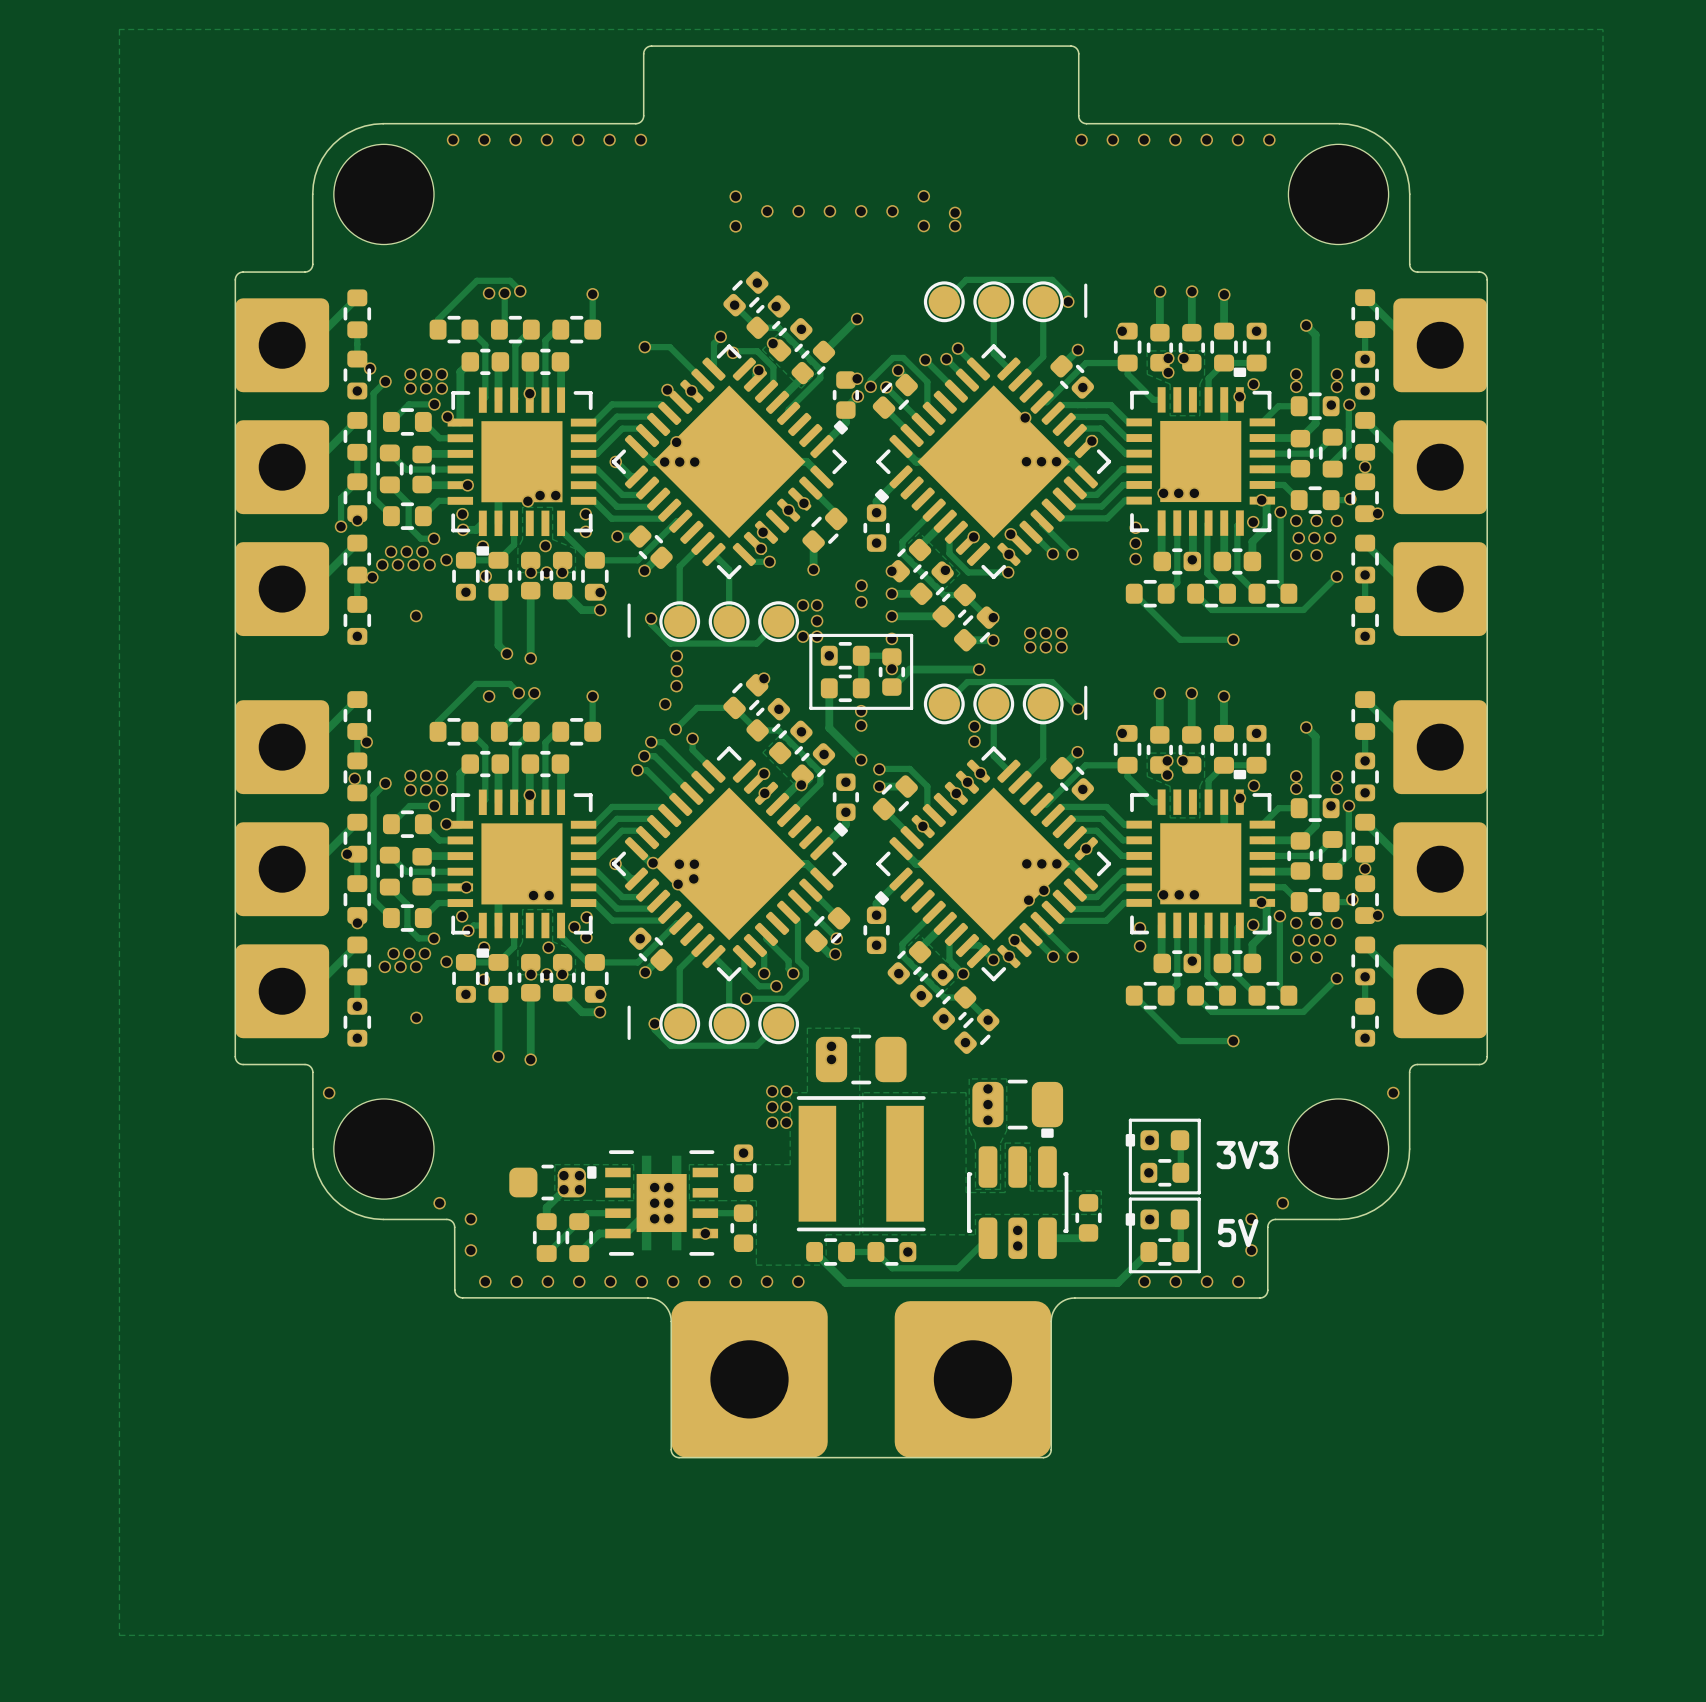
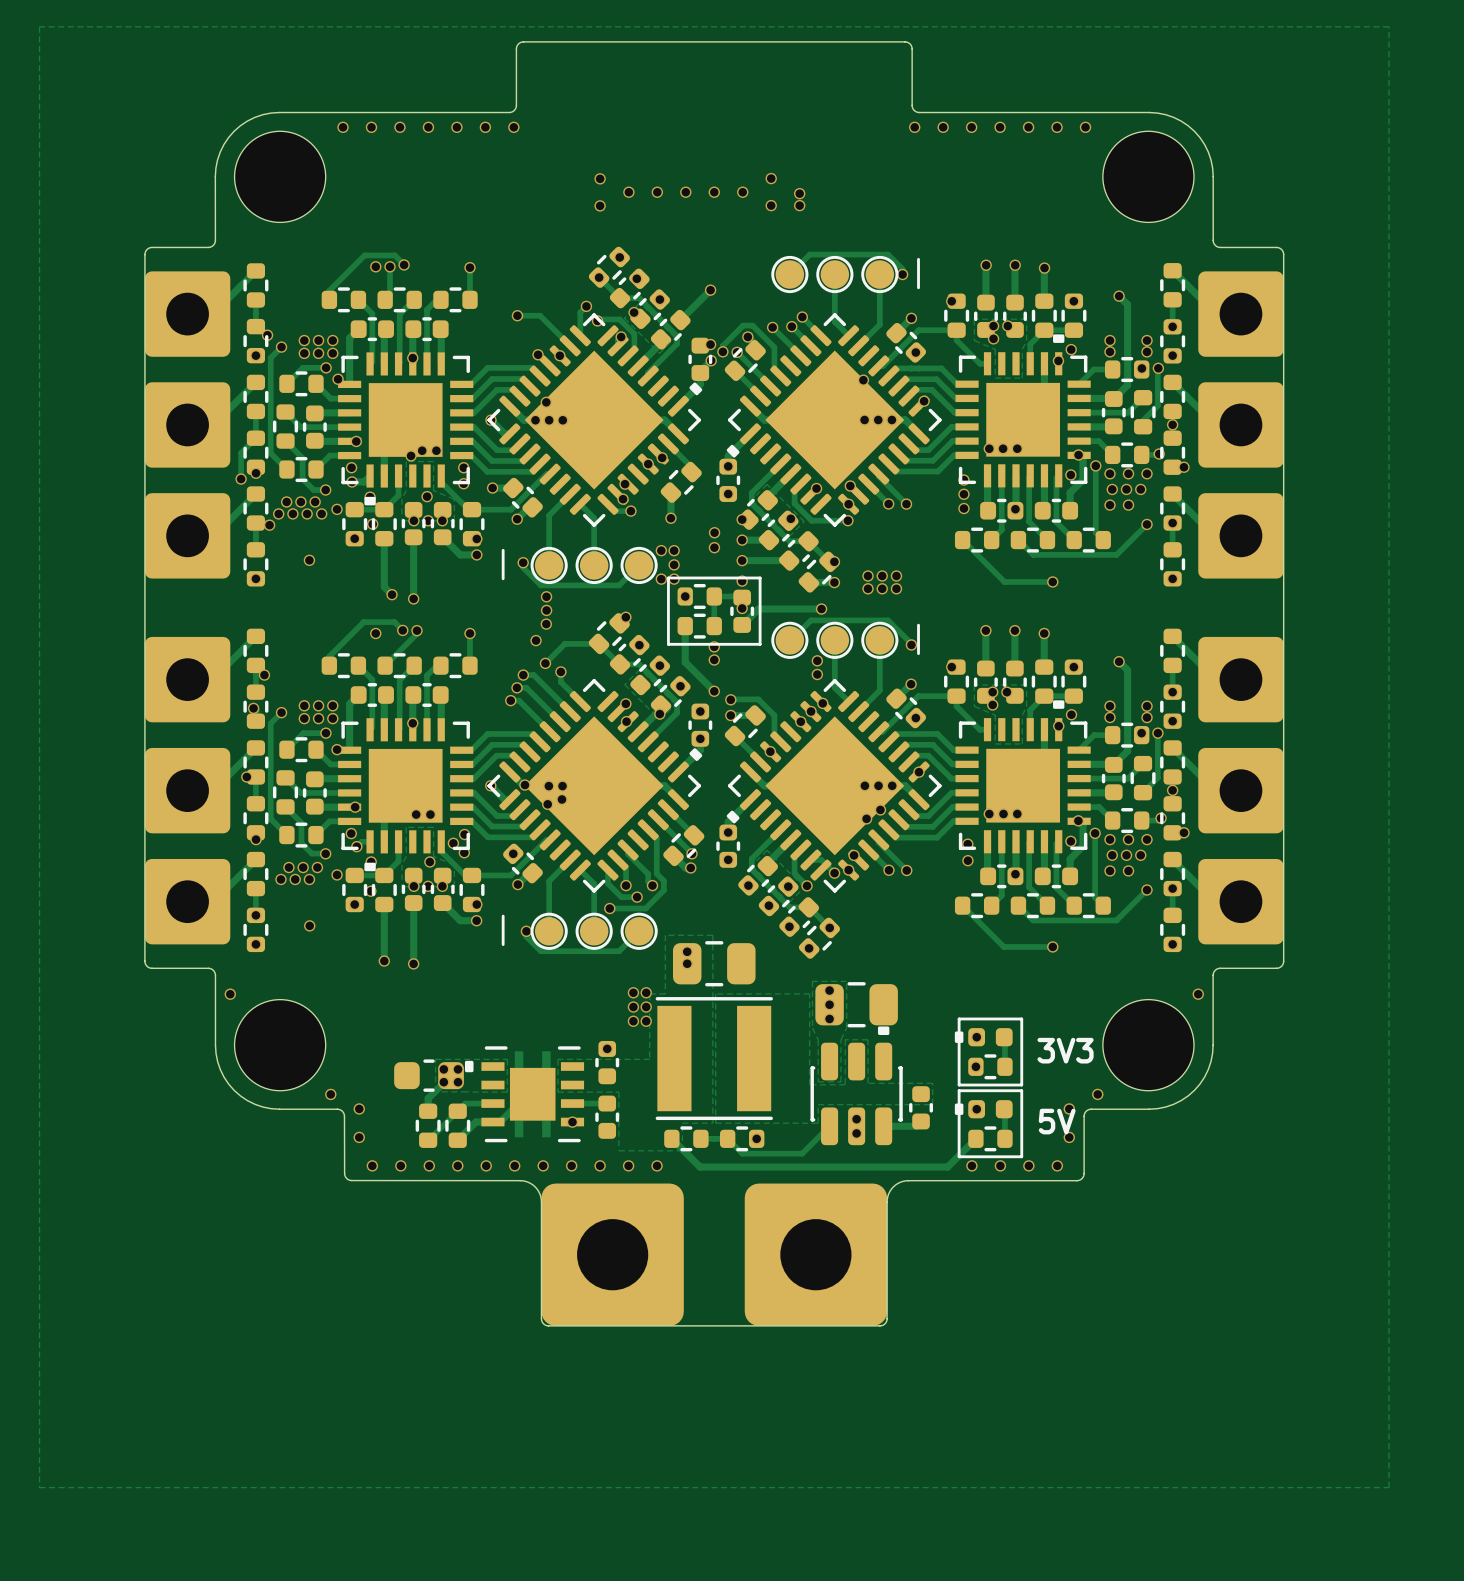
via: (654, 1187) -> none
via: (668, 1187) -> none
via: (654, 1203) -> none
via: (668, 1203) -> none
via: (654, 1218) -> none
via: (668, 1218) -> none

